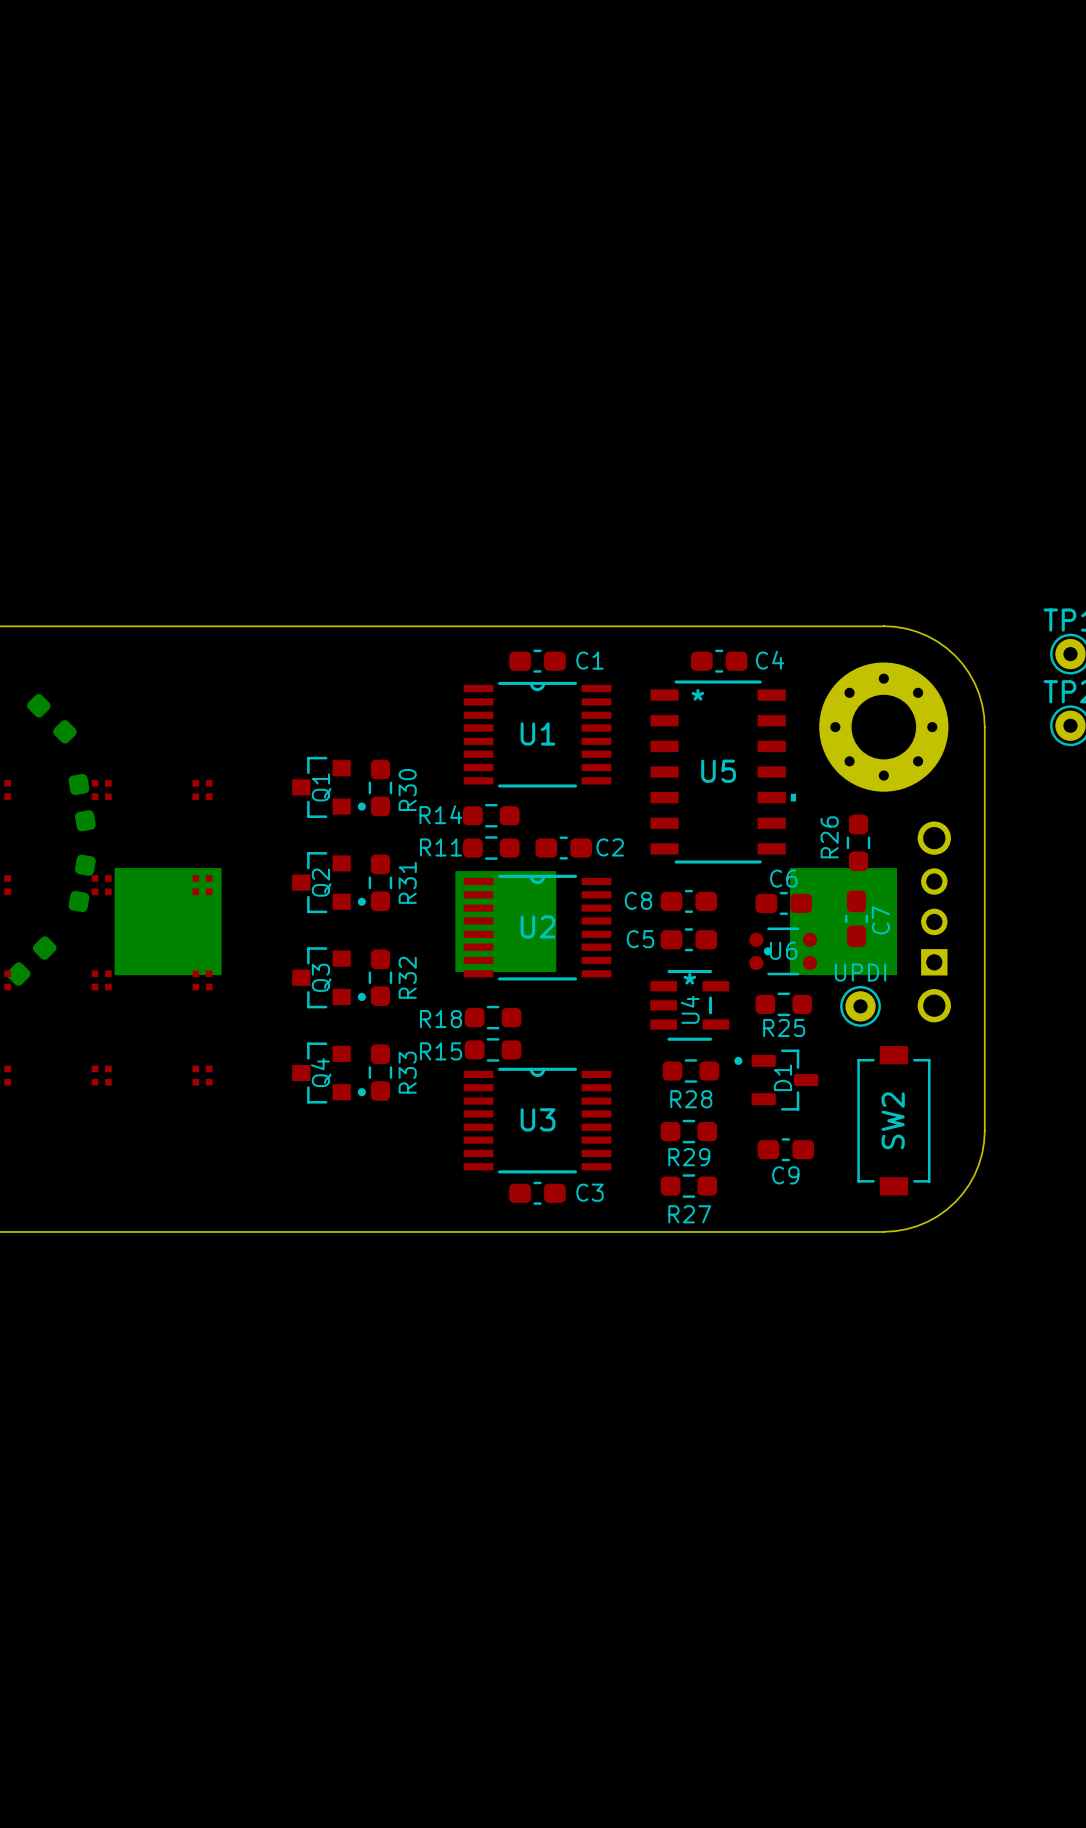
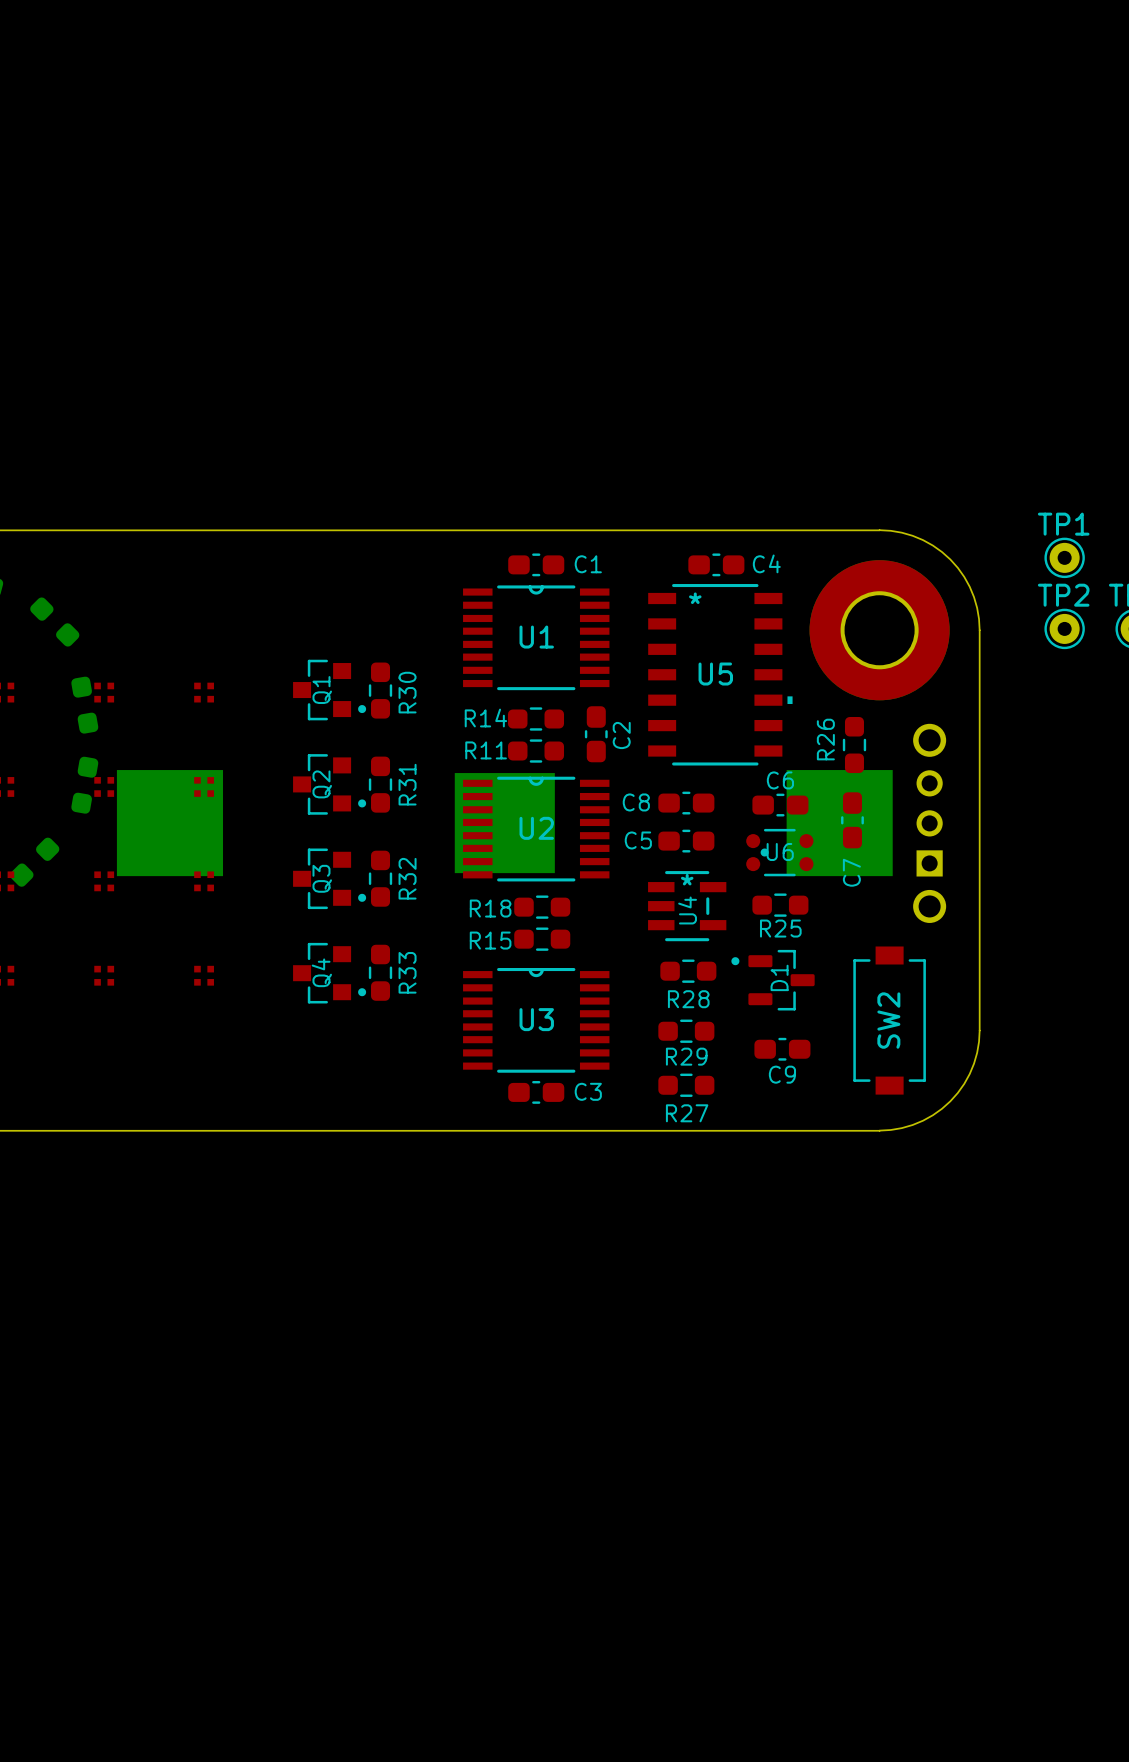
part footprint: [819, 662, 949, 792] -> [809, 560, 950, 701]
R14 position: (491, 815) -> (535, 718)
R11 position: (491, 848) -> (535, 751)
C2 rotation: 0° (563, 848) -> 90° clockwise (596, 734)
C2 position: (563, 848) -> (596, 734)
C7 name position: C7 (880, 920) -> C7 (851, 872)
UPDI: (860, 1006) -> none
R18 position: (493, 1017) -> (542, 907)
R15 position: (493, 1049) -> (542, 939)

